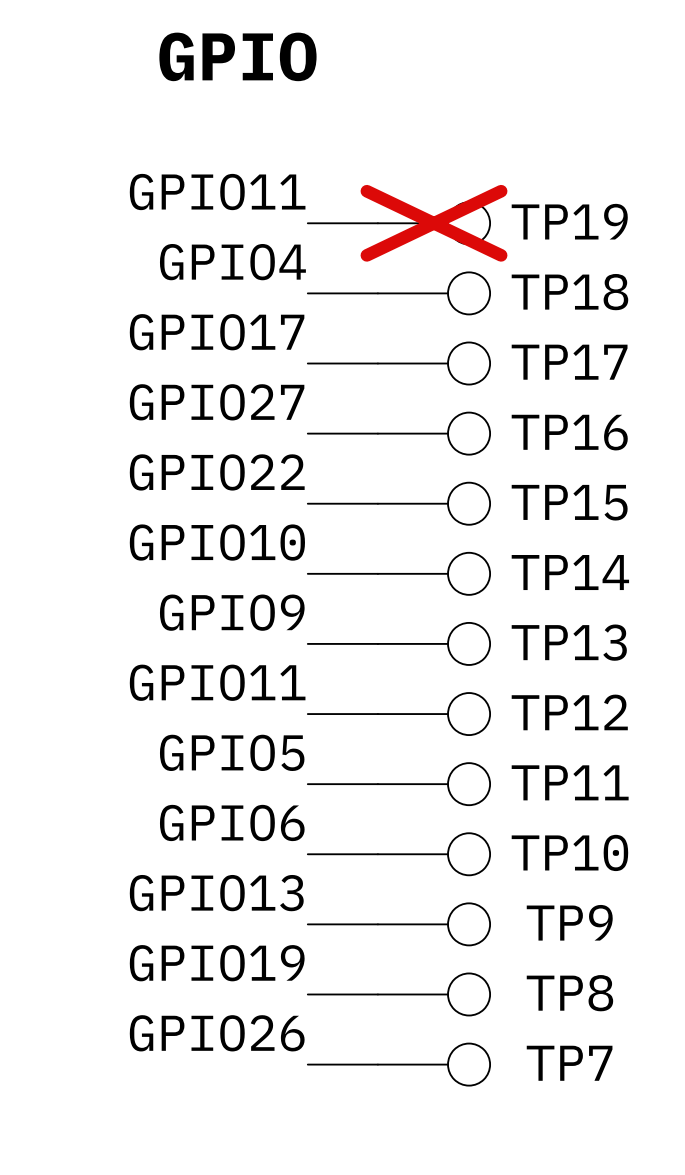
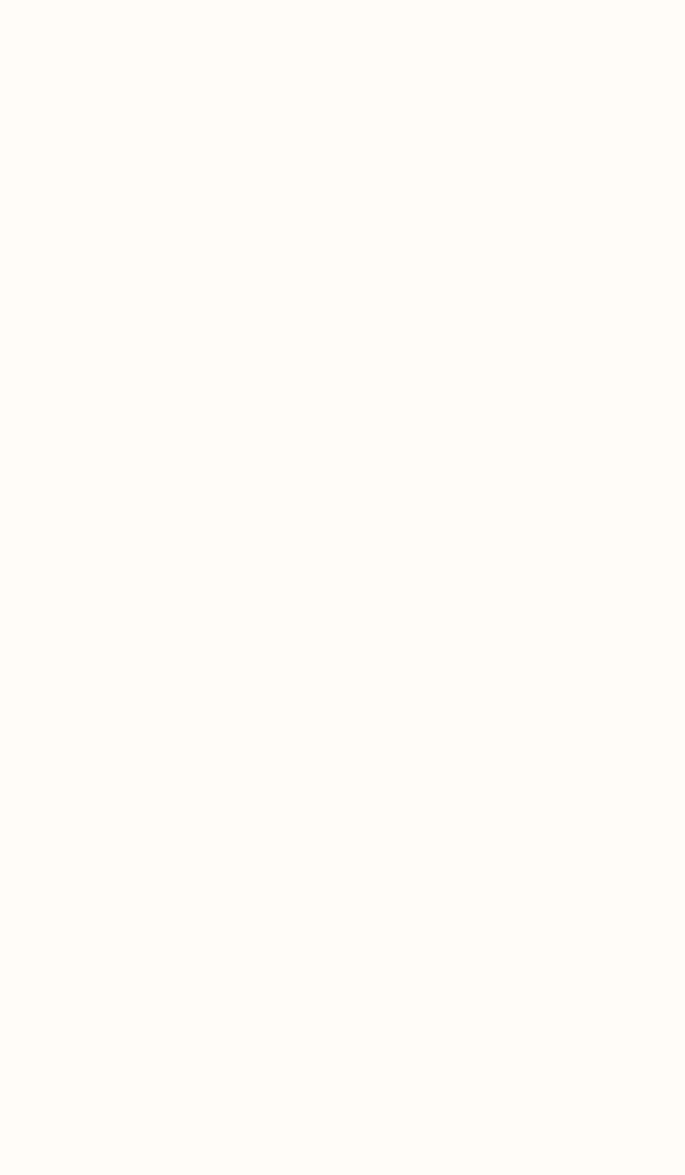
text: GPIO (237, 56) -> none
label: GPIO11 (217, 192) -> none
wire: (307, 223) (377, 223) -> none
TP19: (434, 223) -> none
label: GPIO4 (232, 262) -> none
wire: (307, 293) (377, 293) -> none
TP18: (434, 293) -> none
label: GPIO17 (217, 332) -> none
wire: (307, 363) (377, 363) -> none
TP17: (434, 363) -> none
label: GPIO27 (217, 402) -> none
wire: (307, 433) (377, 433) -> none
TP16: (434, 433) -> none
label: GPIO22 (217, 472) -> none
wire: (307, 503) (377, 503) -> none
TP15: (434, 503) -> none
label: GPIO10 (217, 542) -> none
wire: (307, 573) (377, 573) -> none
TP14: (434, 573) -> none
label: GPIO9 (232, 612) -> none
wire: (307, 643) (377, 643) -> none
TP13: (434, 643) -> none
label: GPIO11 (217, 682) -> none
wire: (307, 714) (377, 714) -> none
TP12: (434, 714) -> none
label: GPIO5 (232, 752) -> none
wire: (307, 784) (377, 784) -> none
TP11: (434, 784) -> none
label: GPIO6 (232, 822) -> none
wire: (307, 854) (377, 854) -> none
TP10: (434, 854) -> none
label: GPIO13 (216, 893) -> none
wire: (307, 924) (377, 924) -> none
TP9: (434, 924) -> none
label: GPIO19 (217, 963) -> none
wire: (307, 994) (377, 994) -> none
TP8: (434, 994) -> none
label: GPIO26 (217, 1033) -> none
wire: (307, 1064) (377, 1064) -> none
TP7: (434, 1064) -> none

